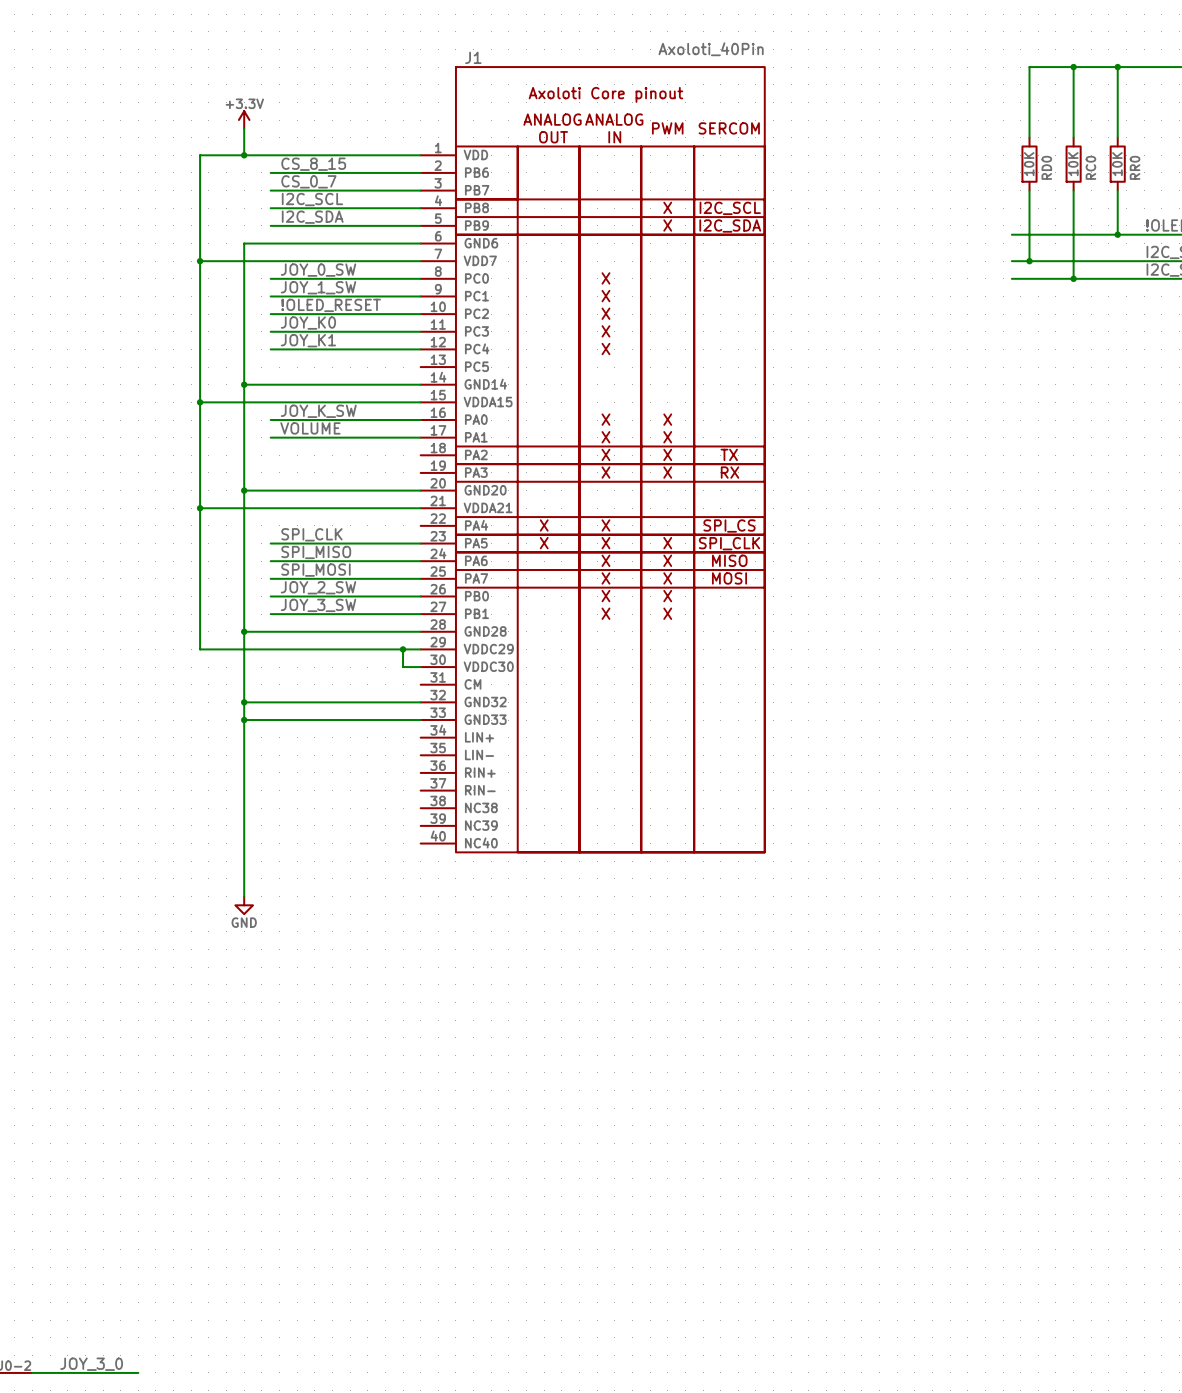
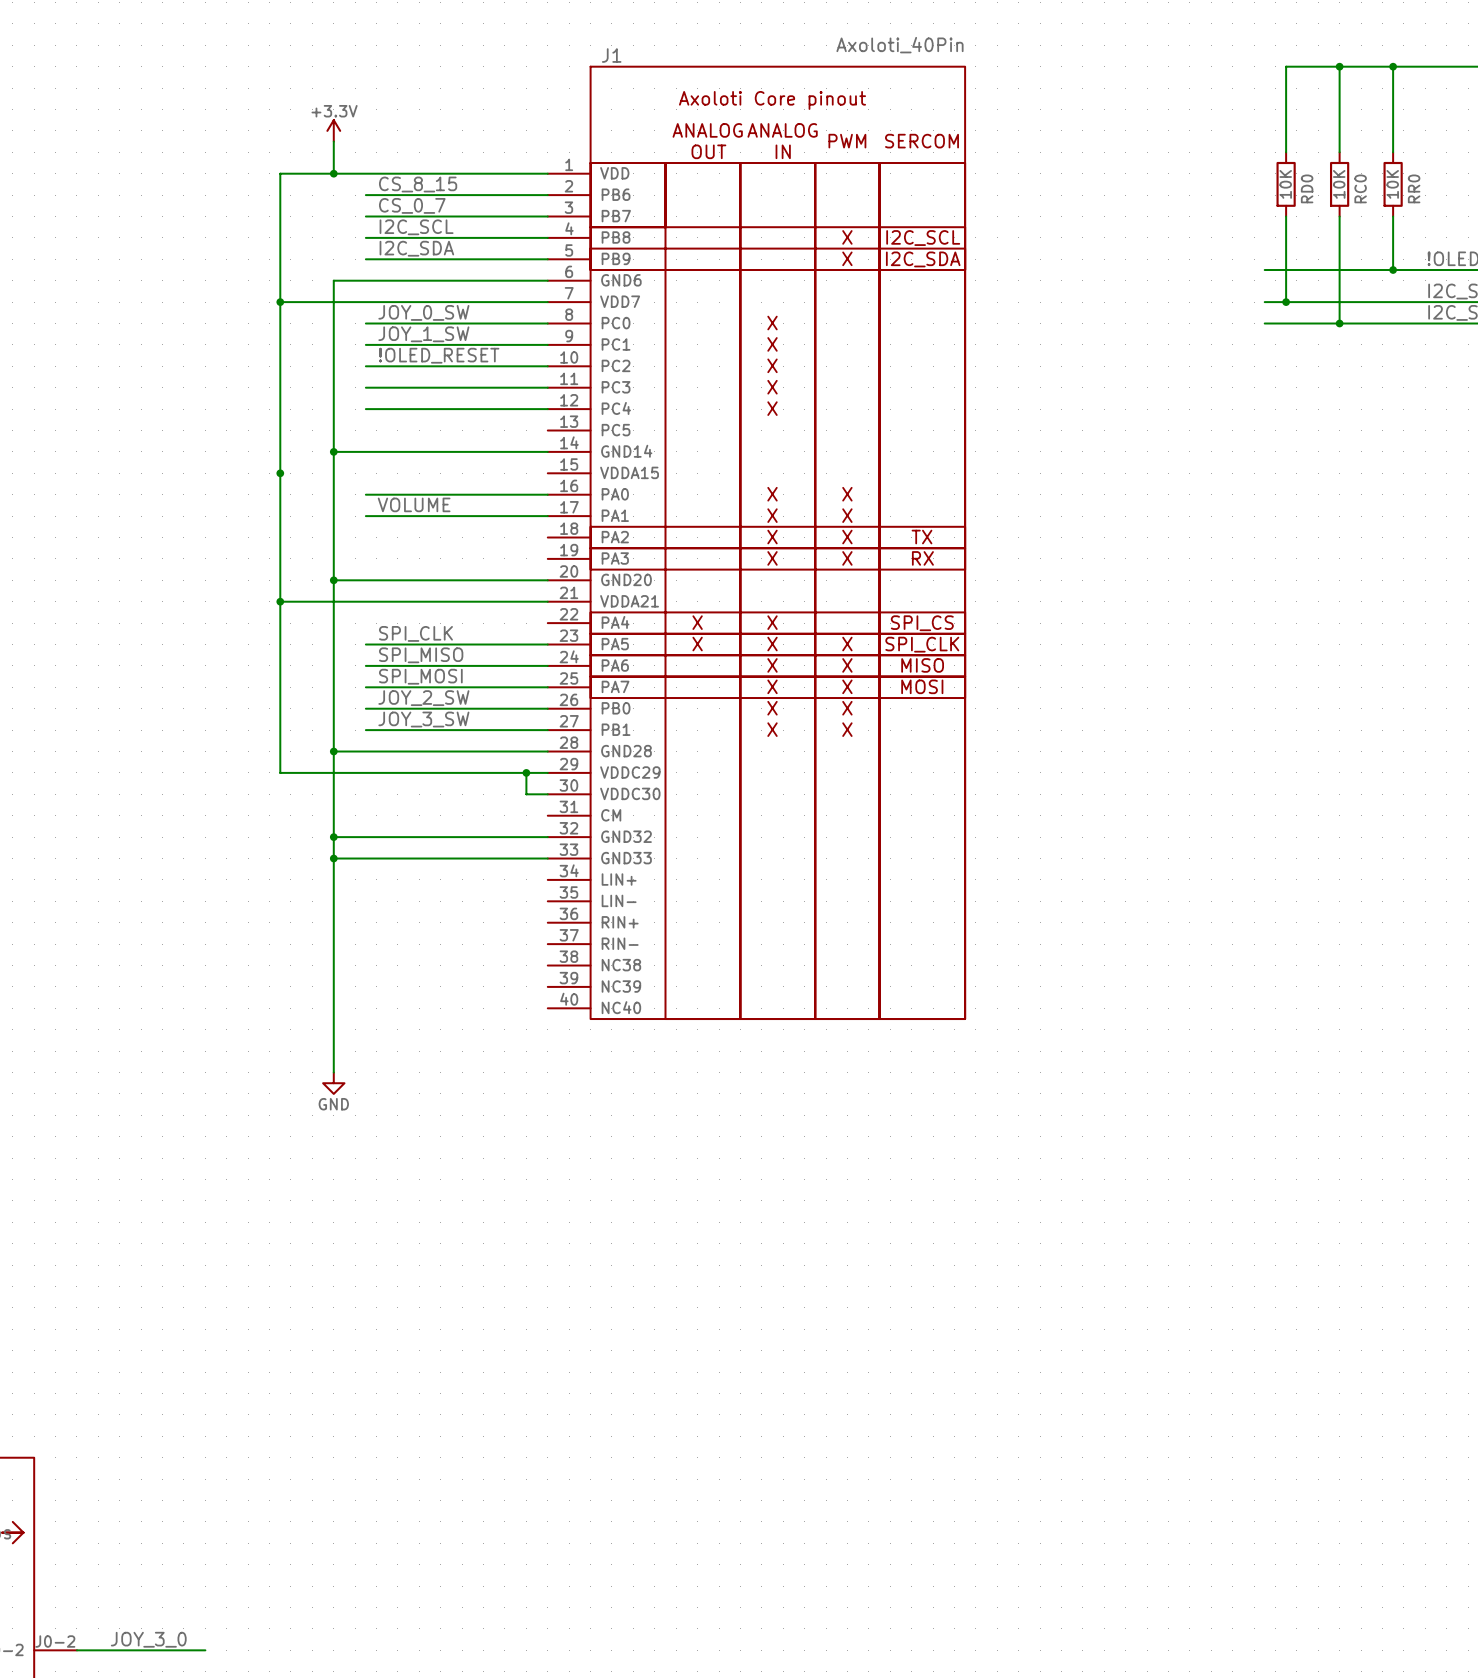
label: JOY_K0 (308, 323) -> none
label: JOY_K1 (308, 340) -> none
wire: (200, 402) (420, 402) -> none
label: JOY_K_SW (318, 411) -> none

